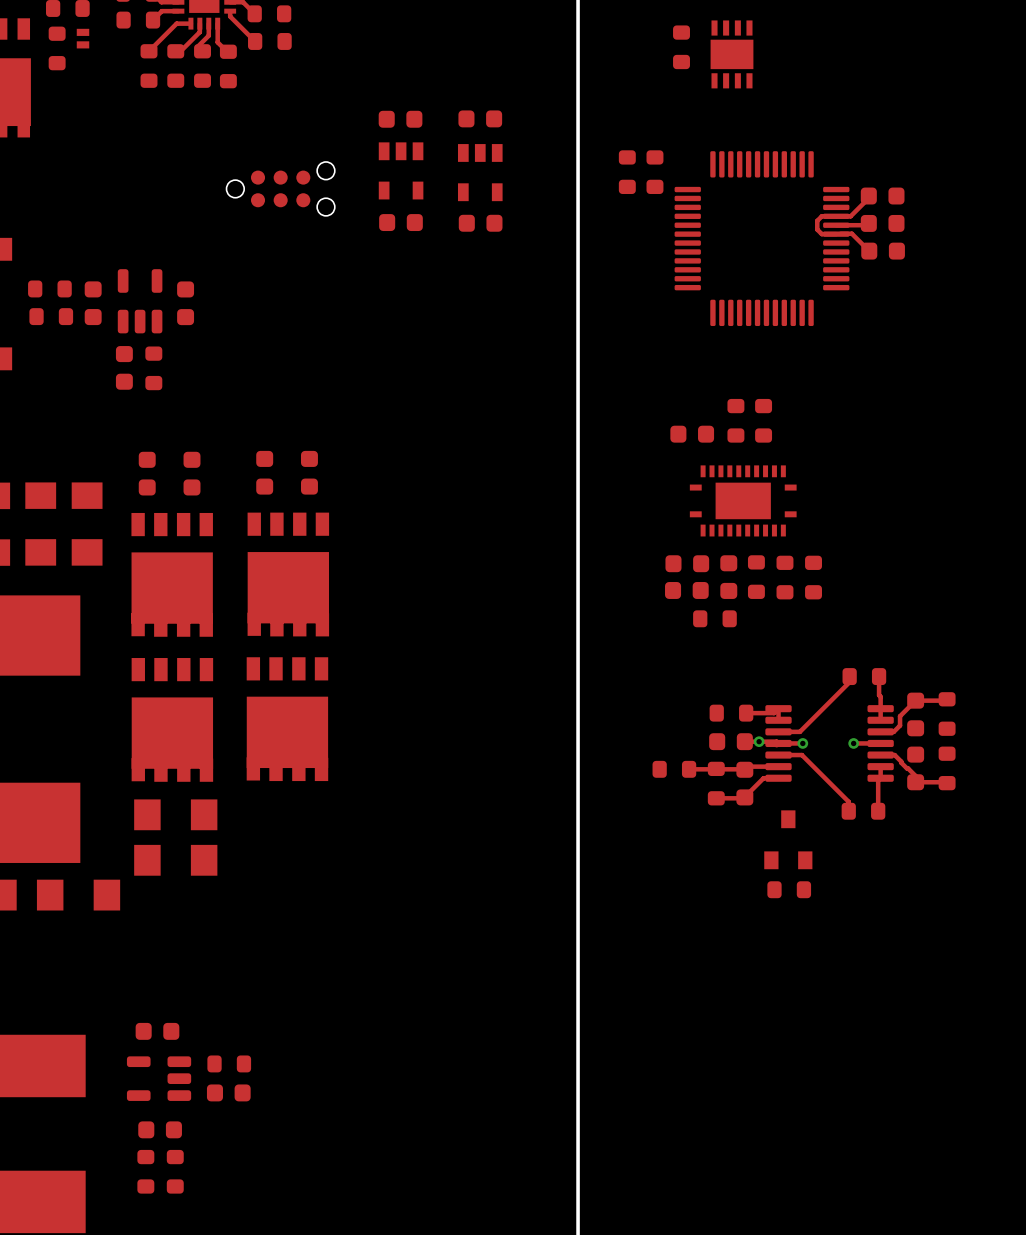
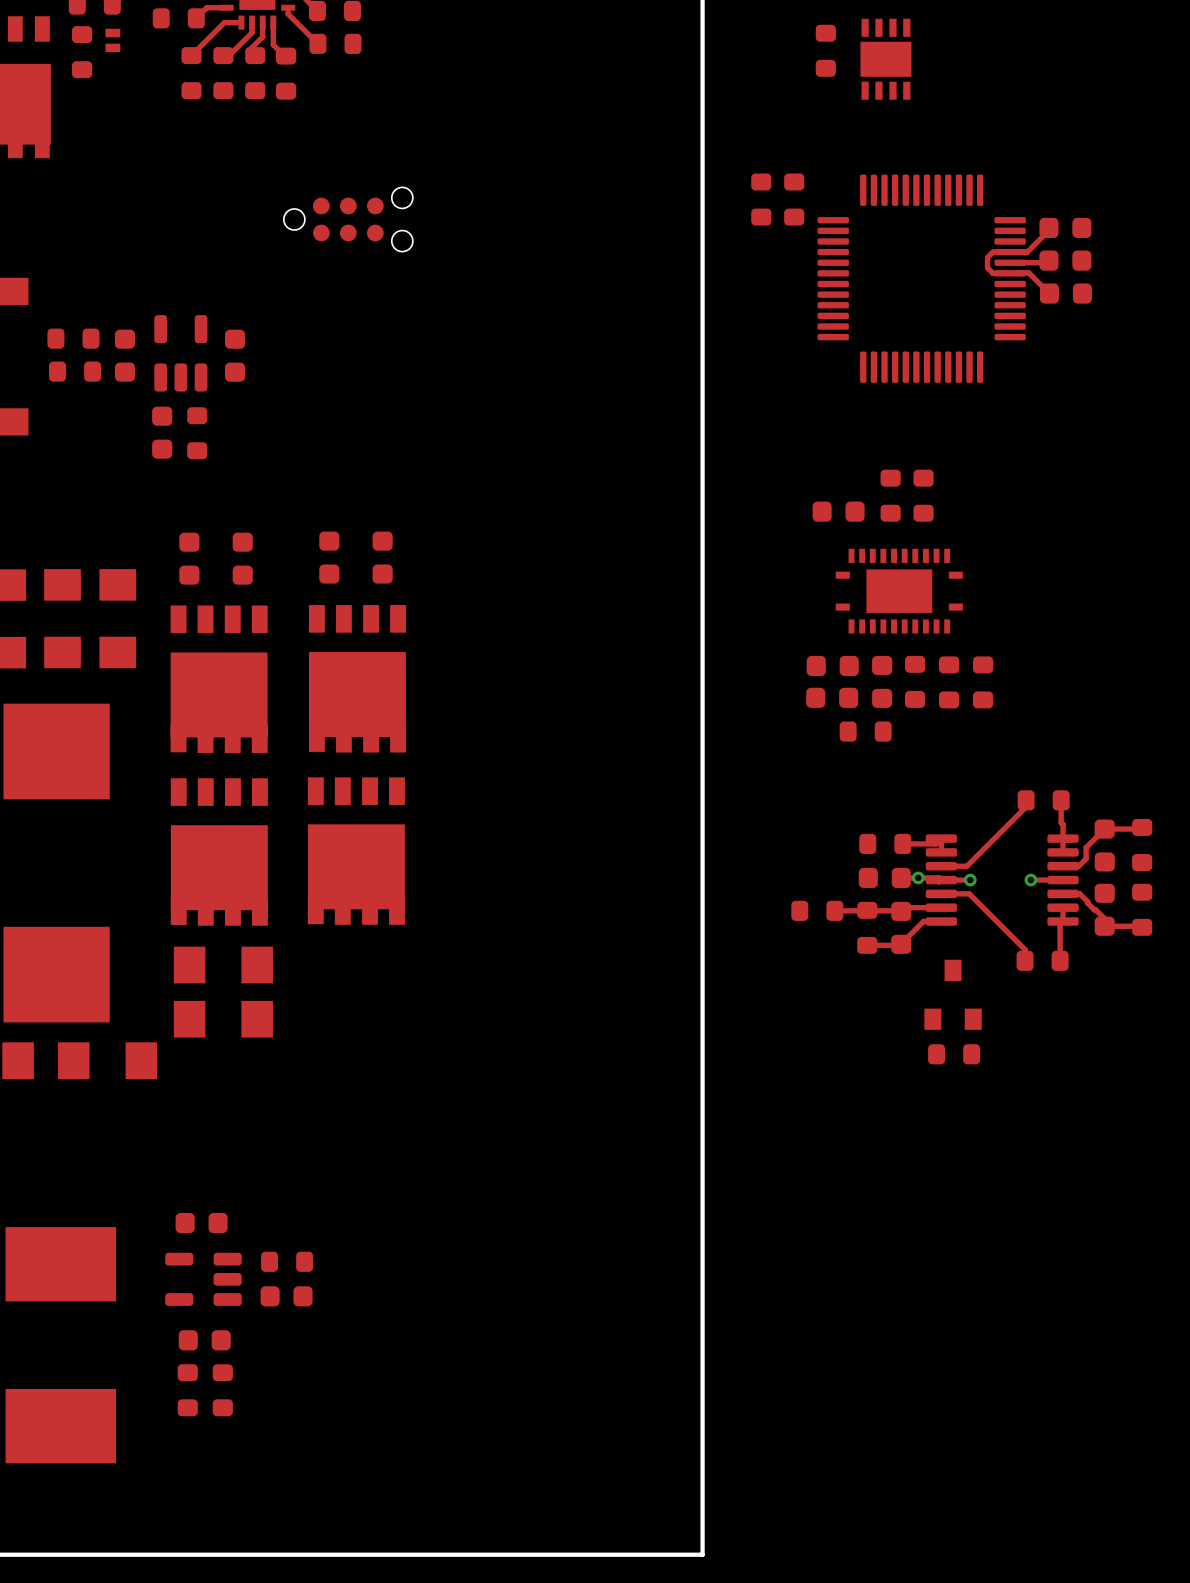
part: (480, 118) -> none
part: (400, 119) -> none
part: (401, 170) -> none
part: (480, 172) -> none
part: (400, 222) -> none
part: (480, 223) -> none

